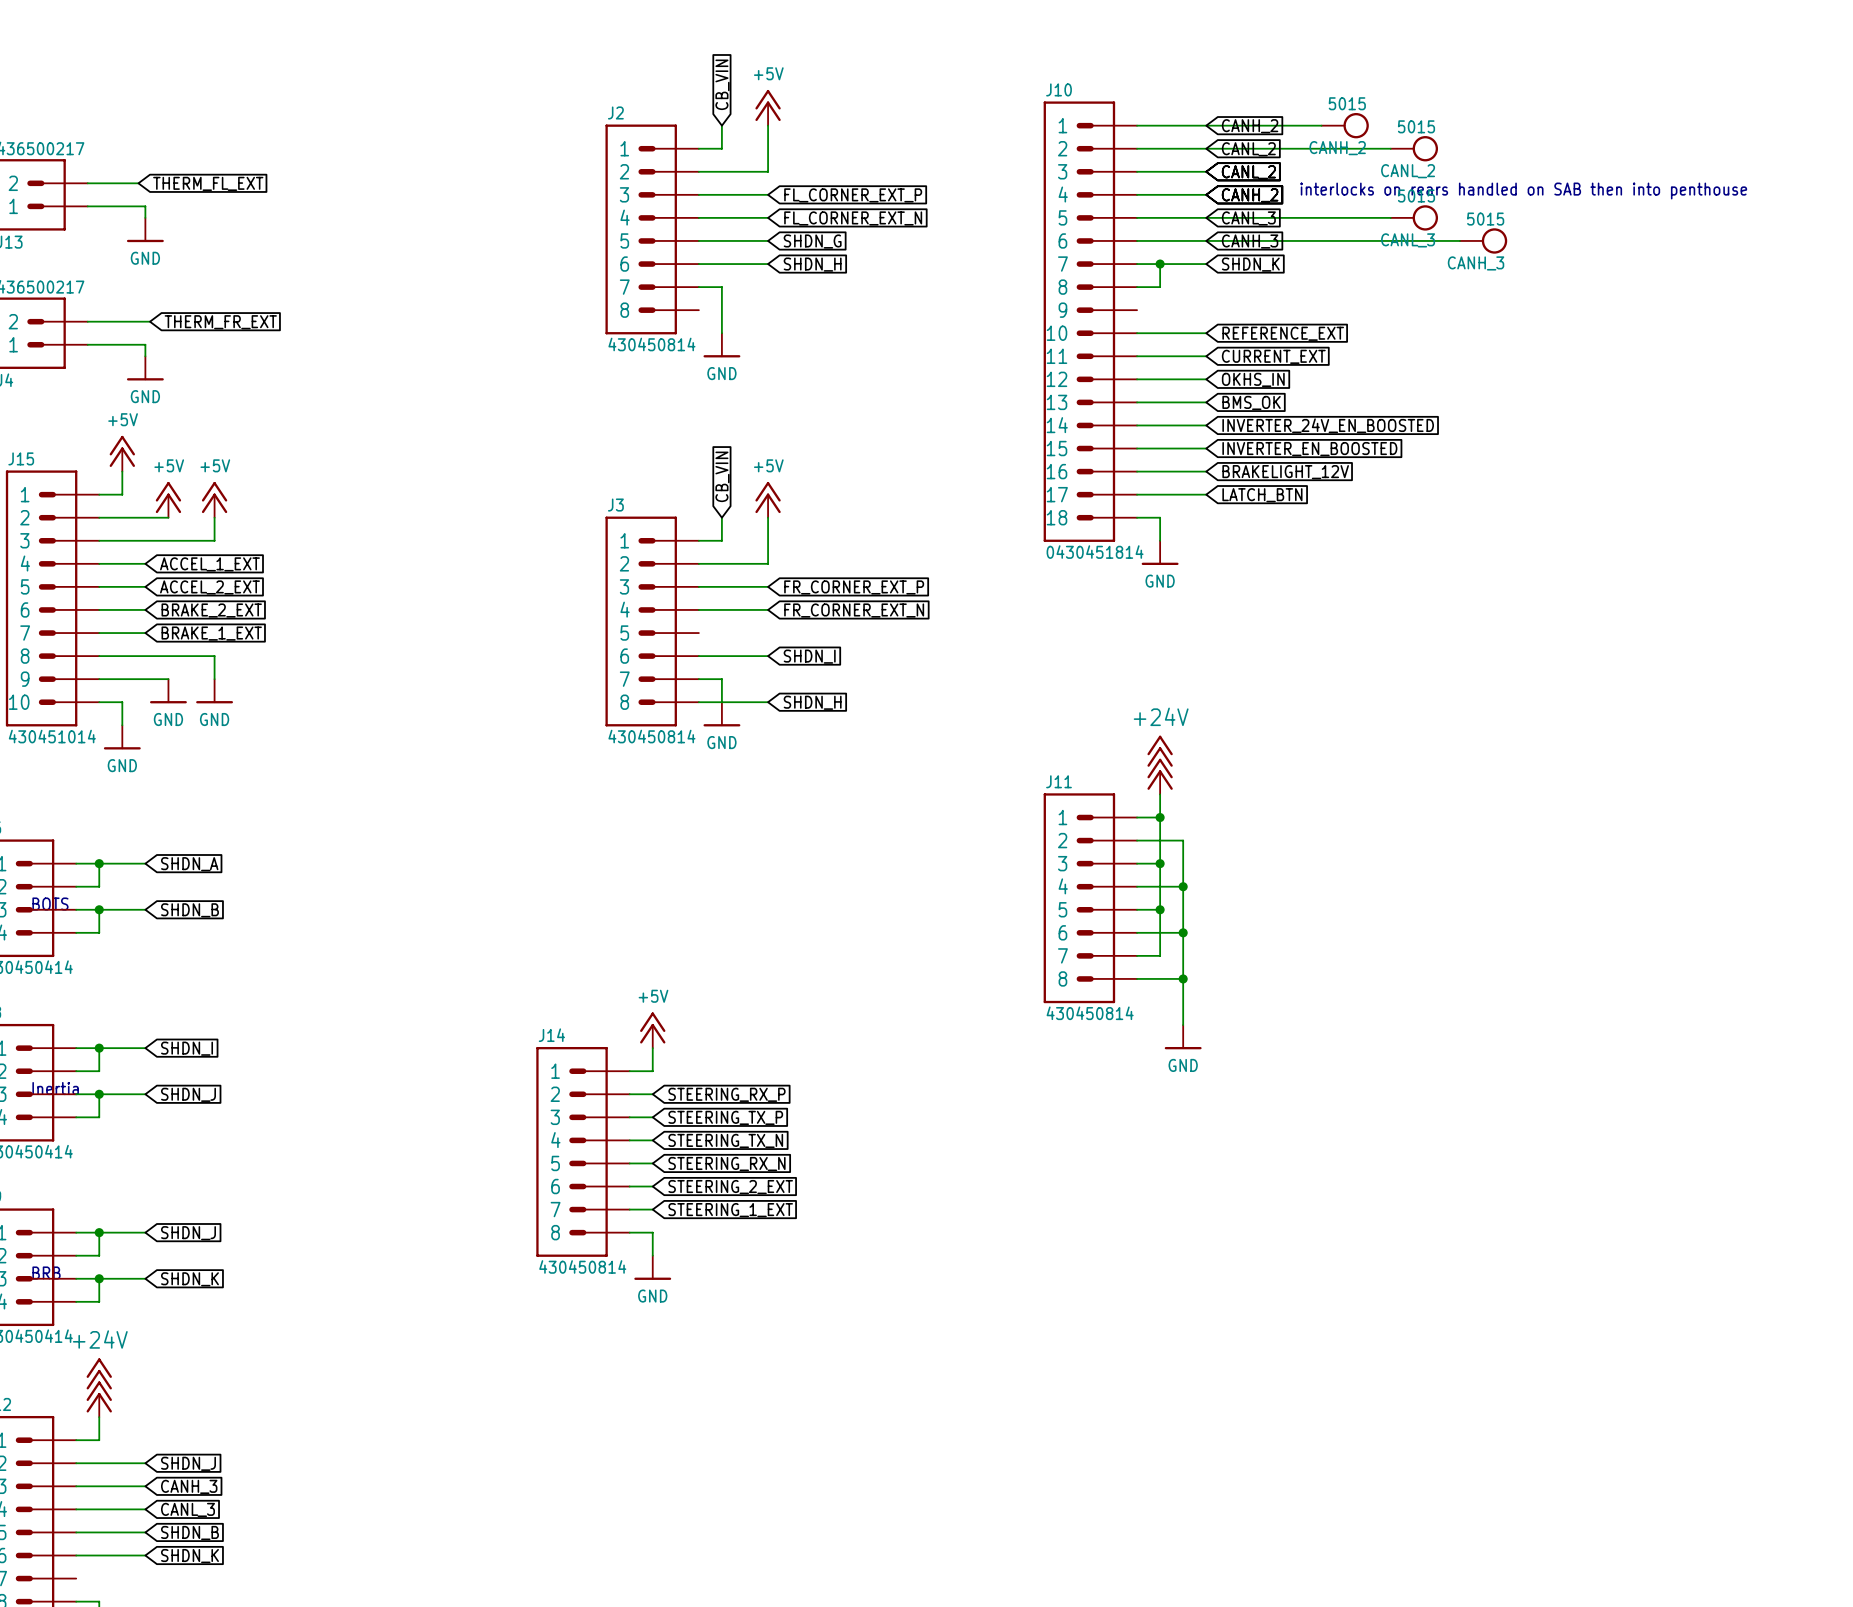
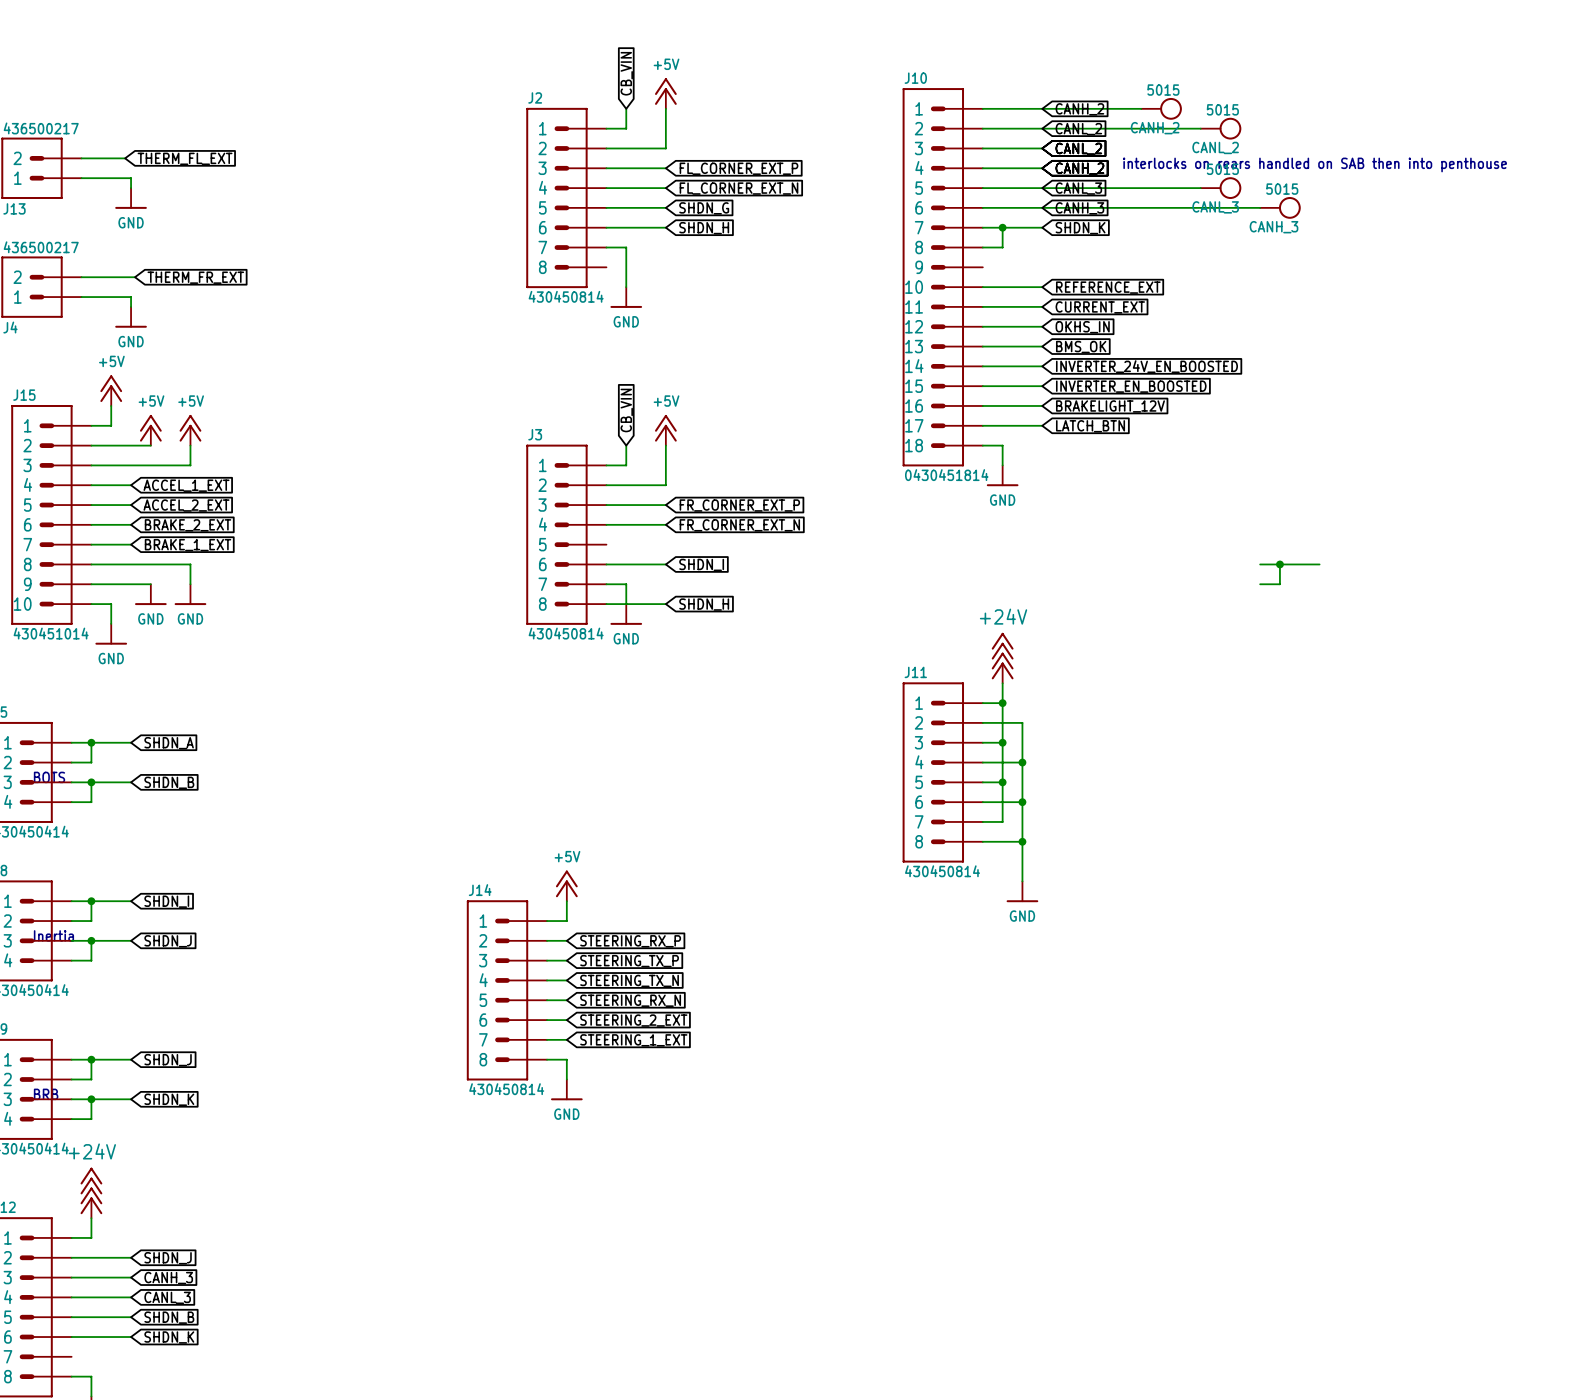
wire: none -> (1260, 564) (1319, 564)
wire: none -> (1279, 564) (1279, 584) (1260, 584)
junction: none -> (1279, 564)

